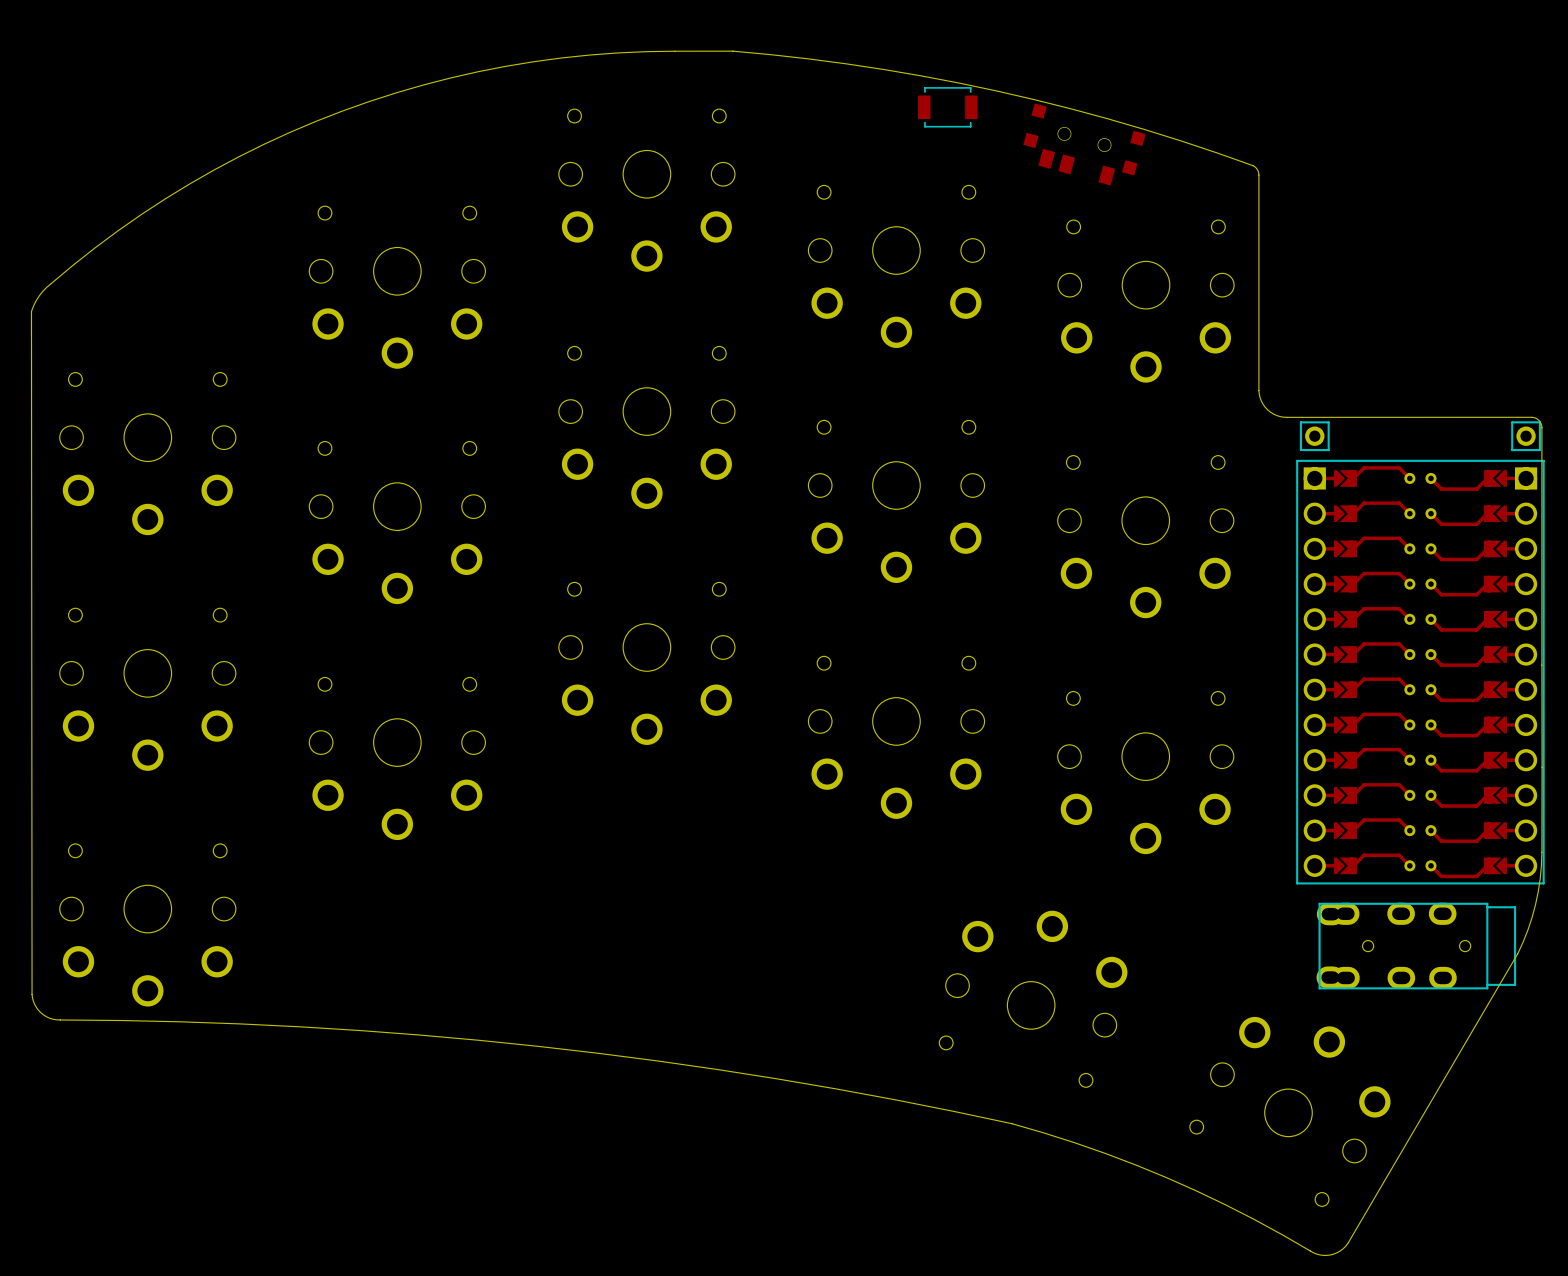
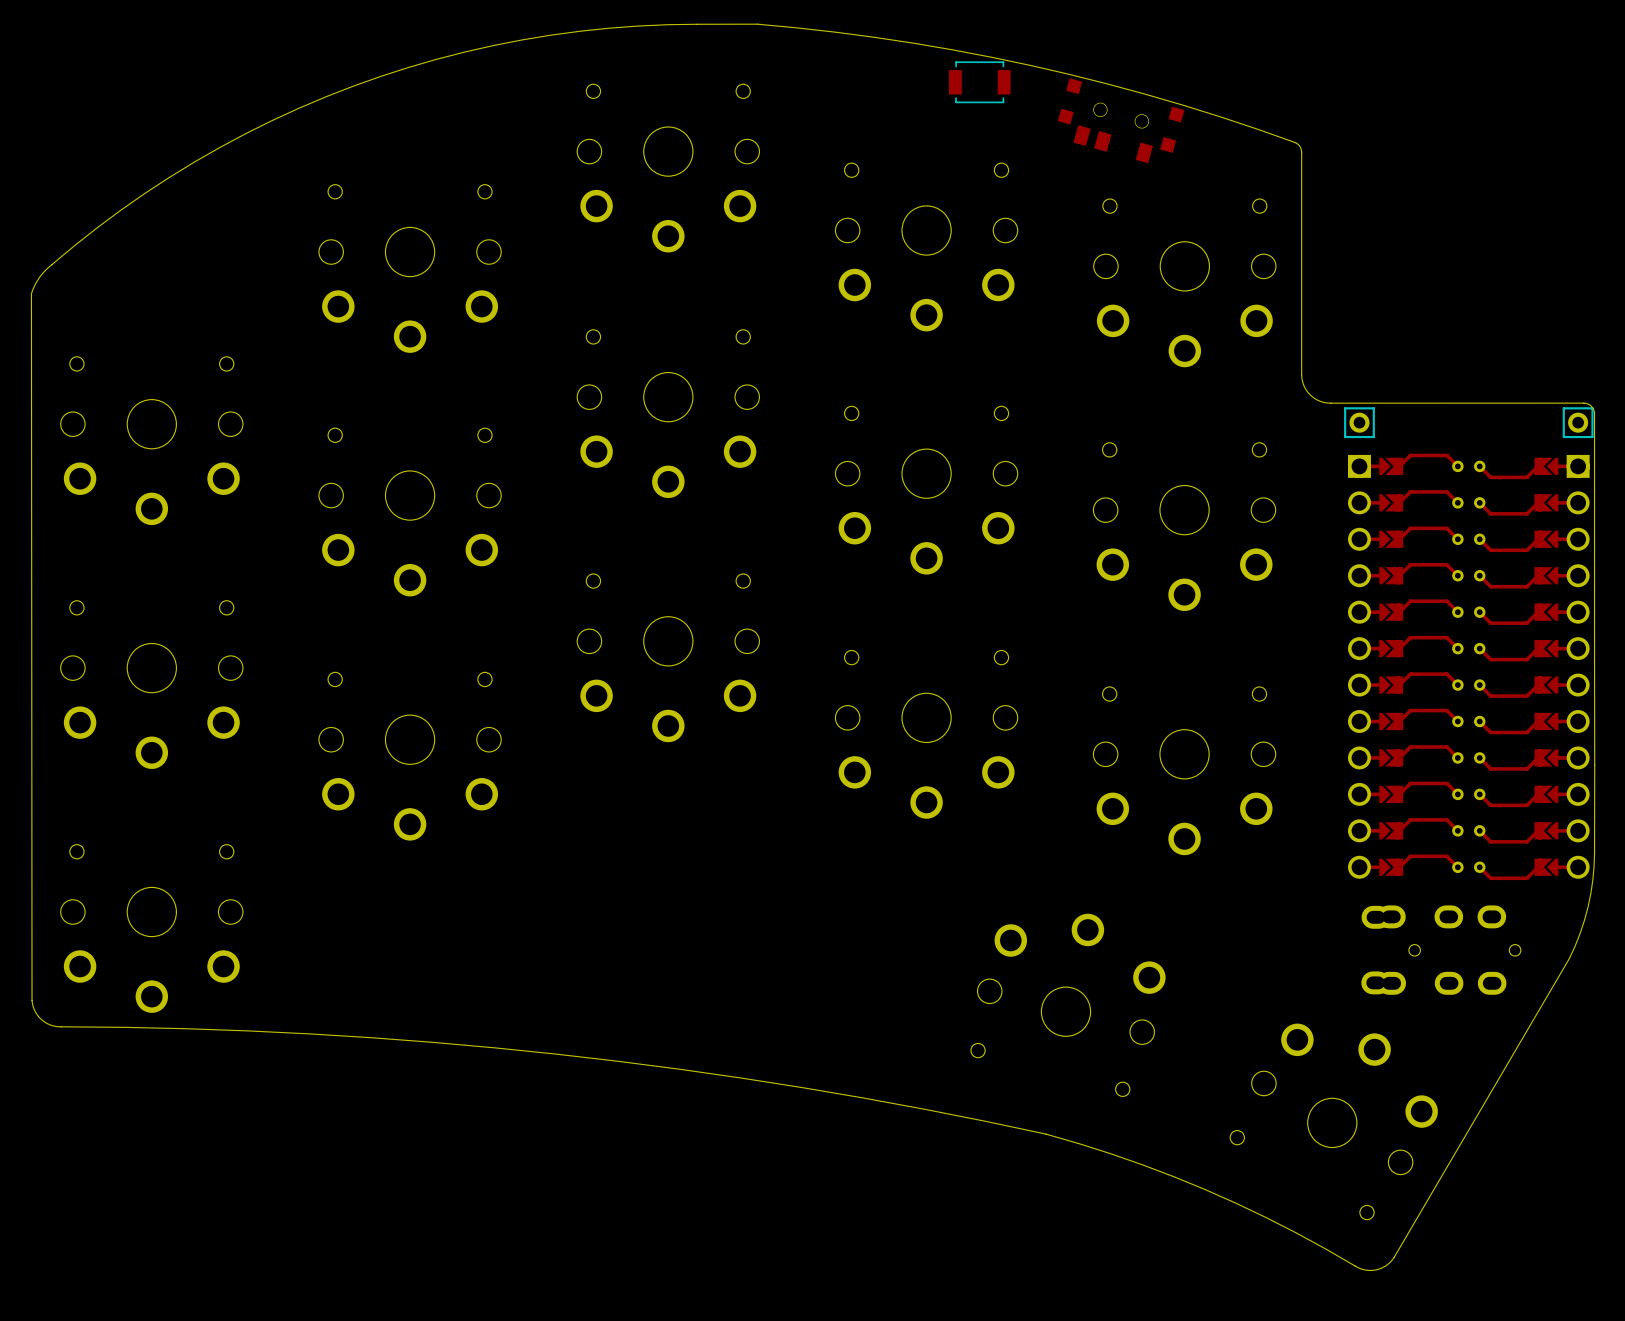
part footprint: [1296, 459, 1545, 885] -> [1348, 453, 1590, 881]
part: none -> (1441, 950)
part: (1416, 946) -> none

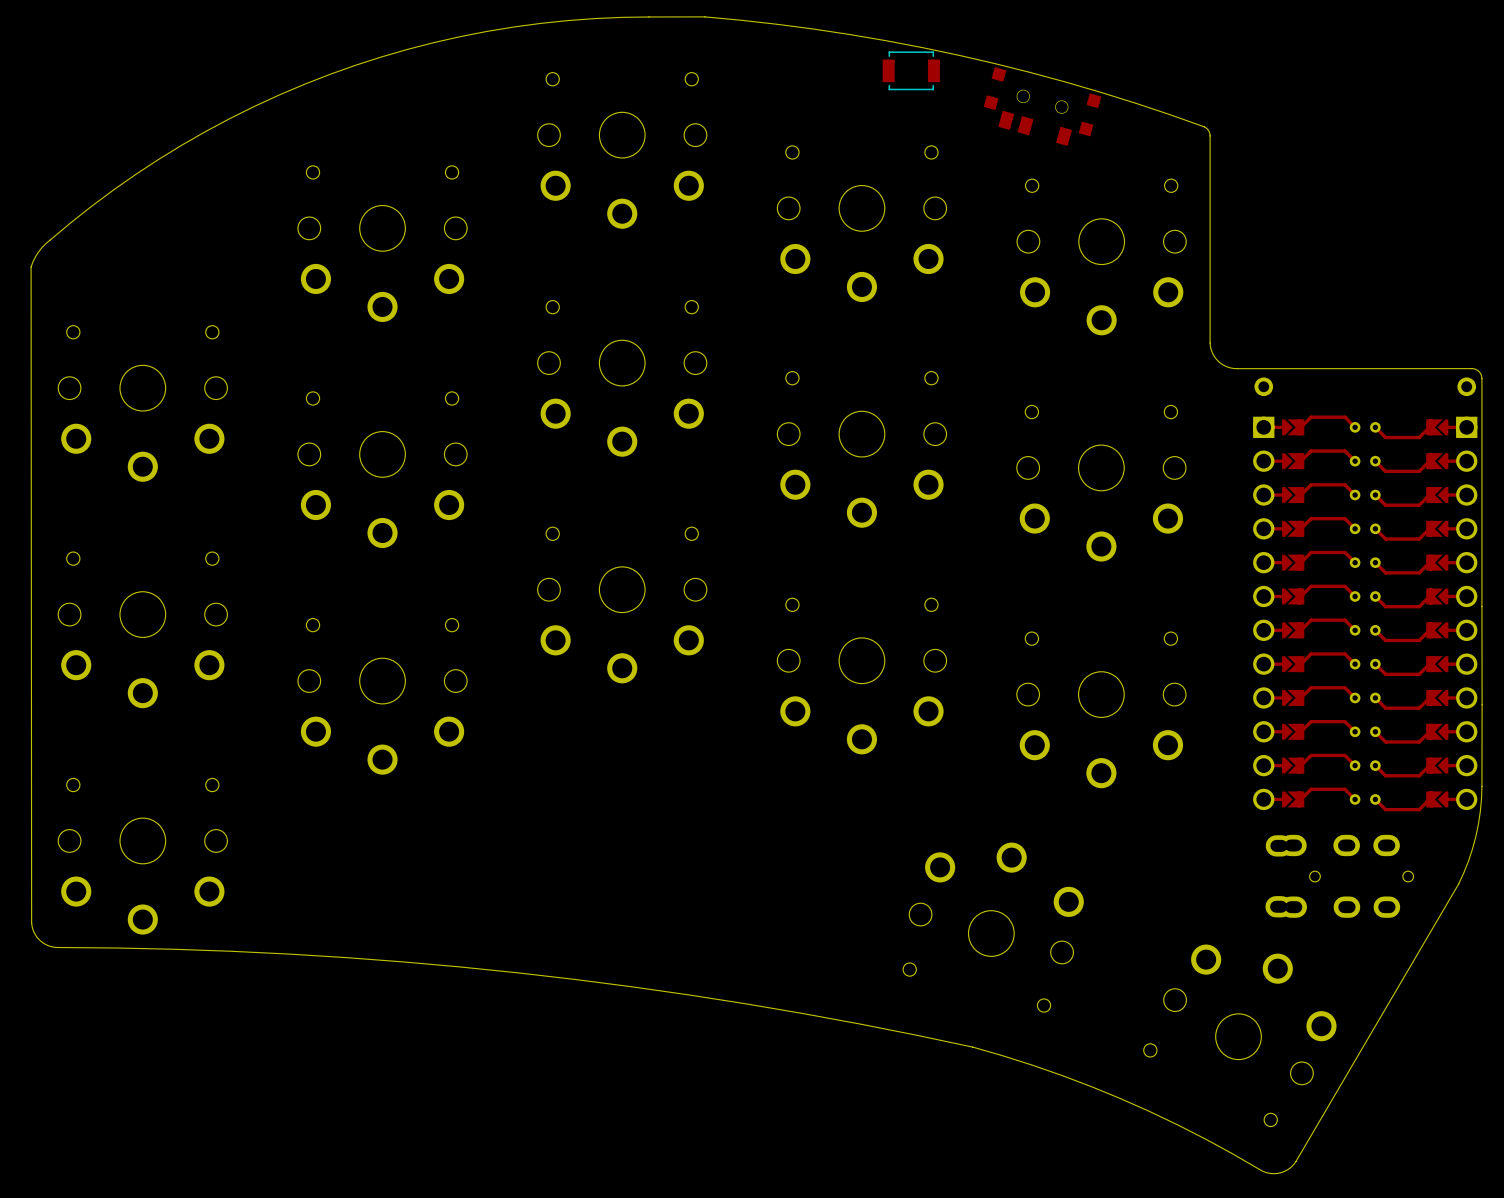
part footprint: [1344, 407, 1375, 439] -> [1254, 377, 1274, 397]
part footprint: [1562, 407, 1594, 439] -> [1457, 377, 1477, 397]

